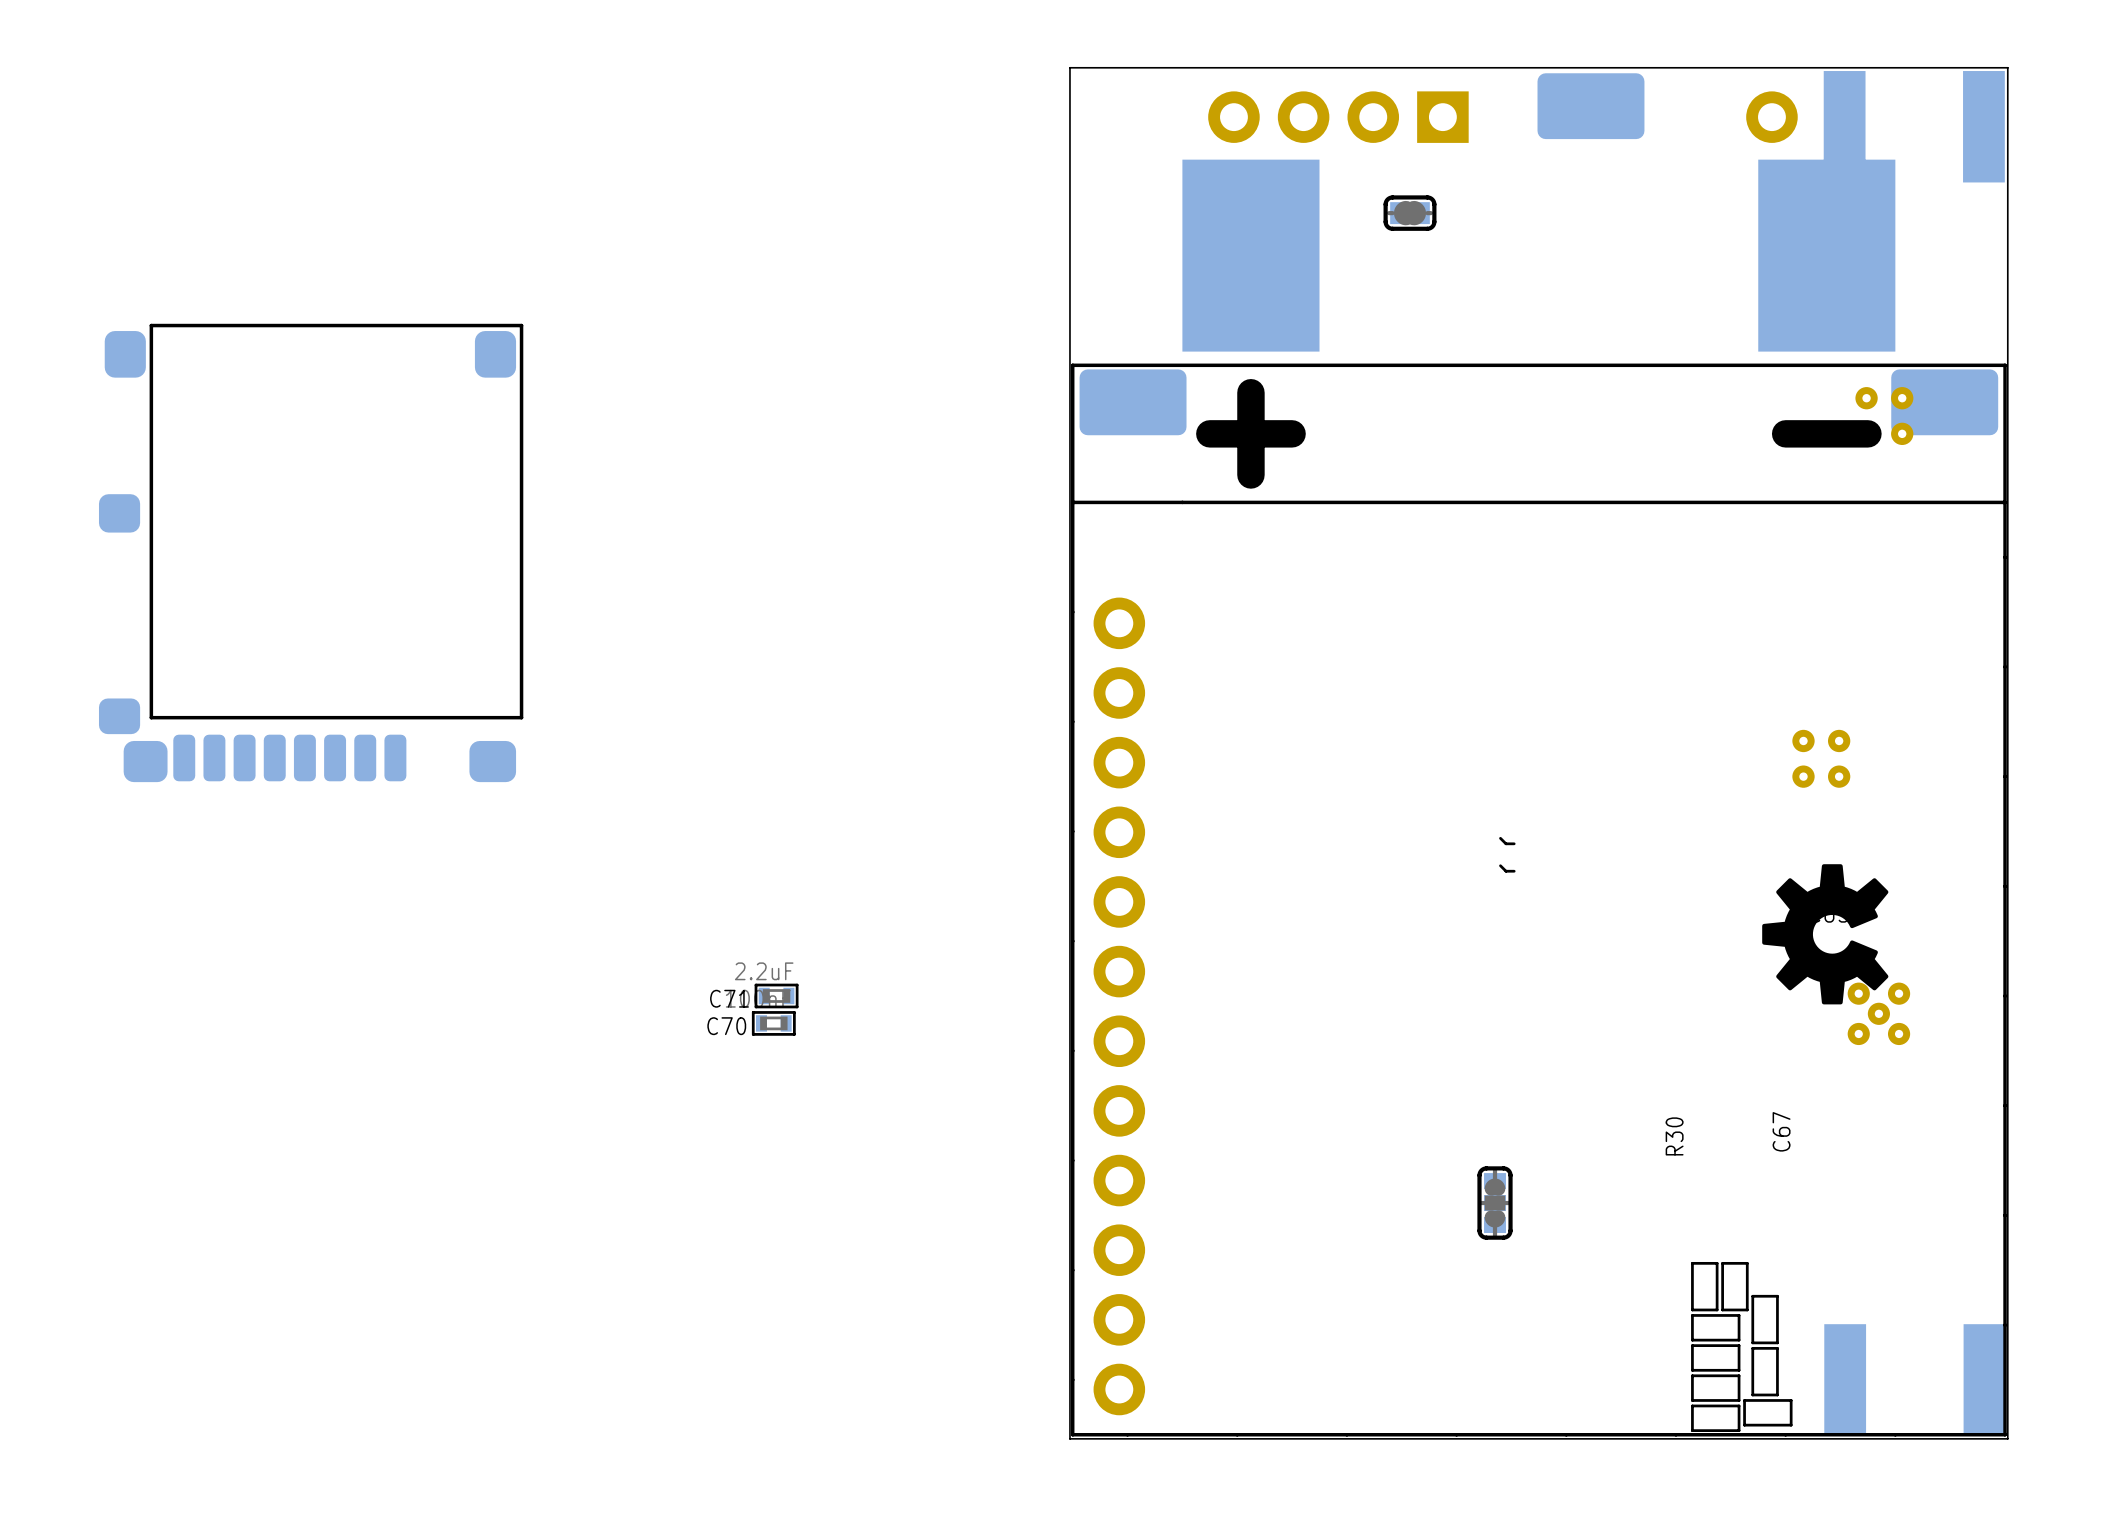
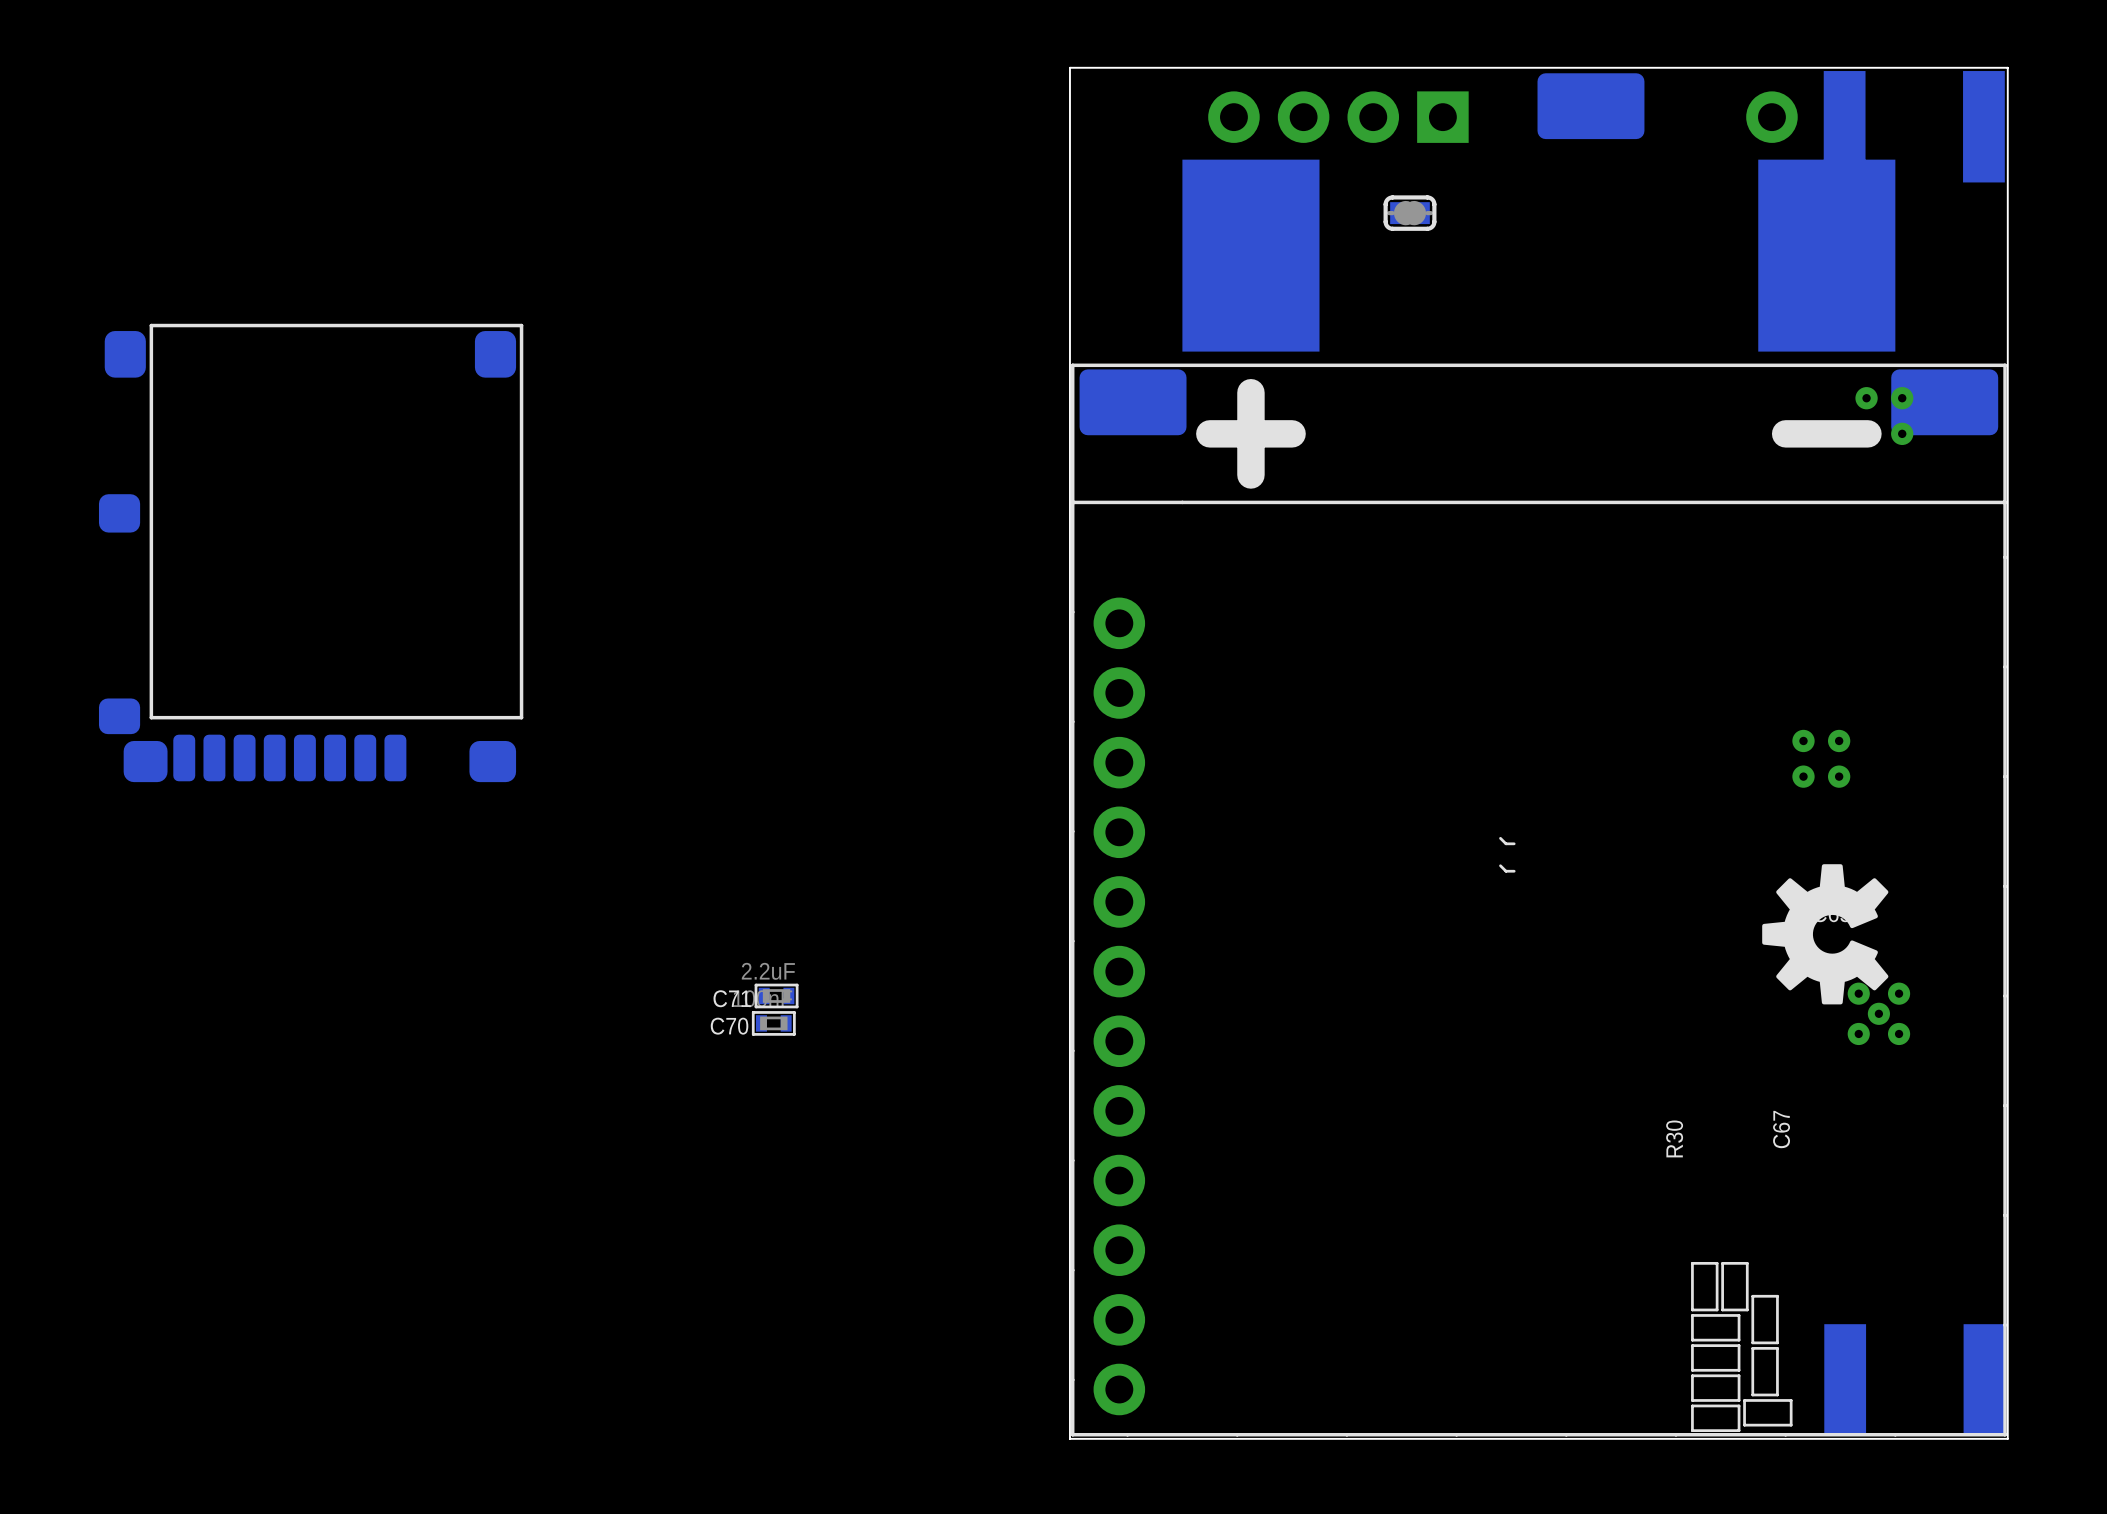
part: (1495, 1203) -> none

